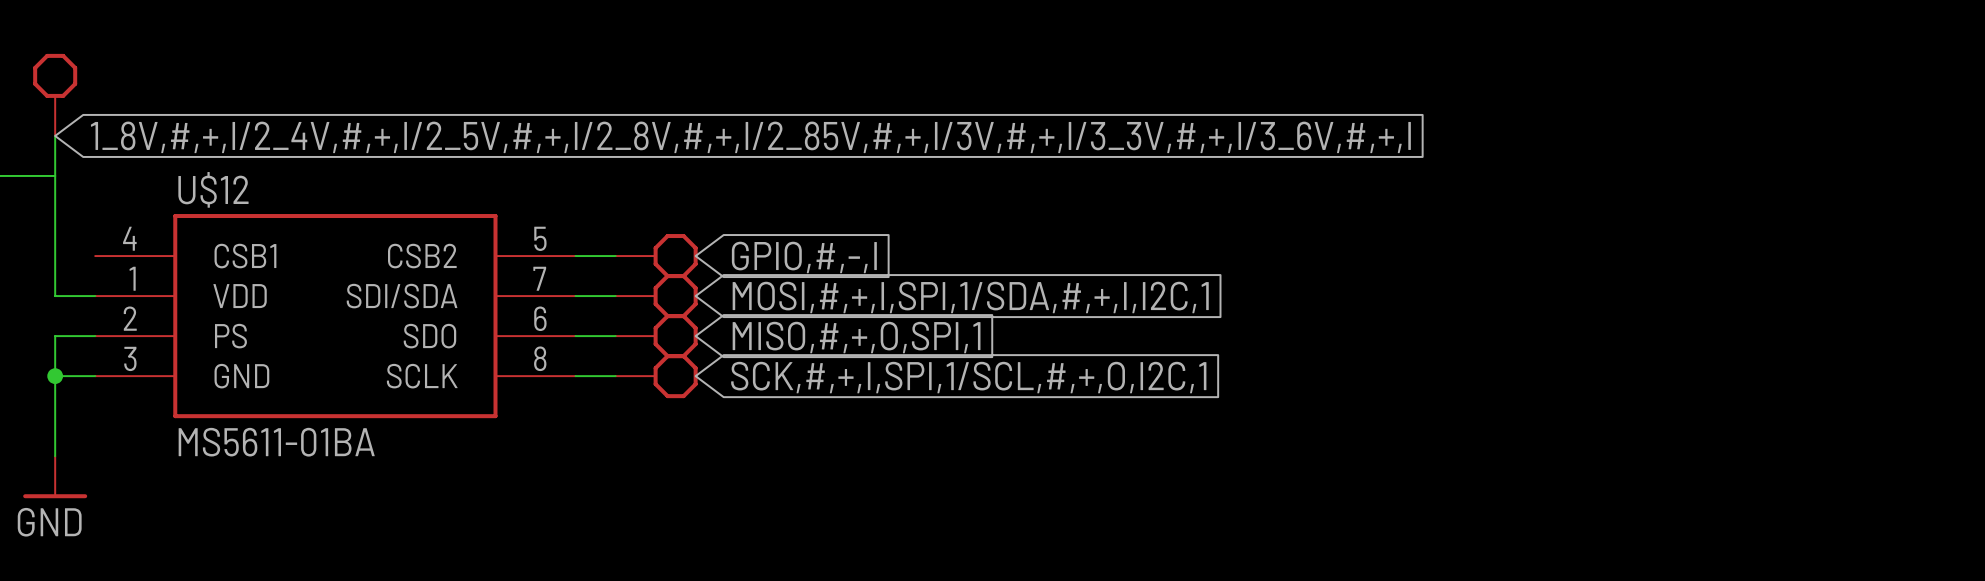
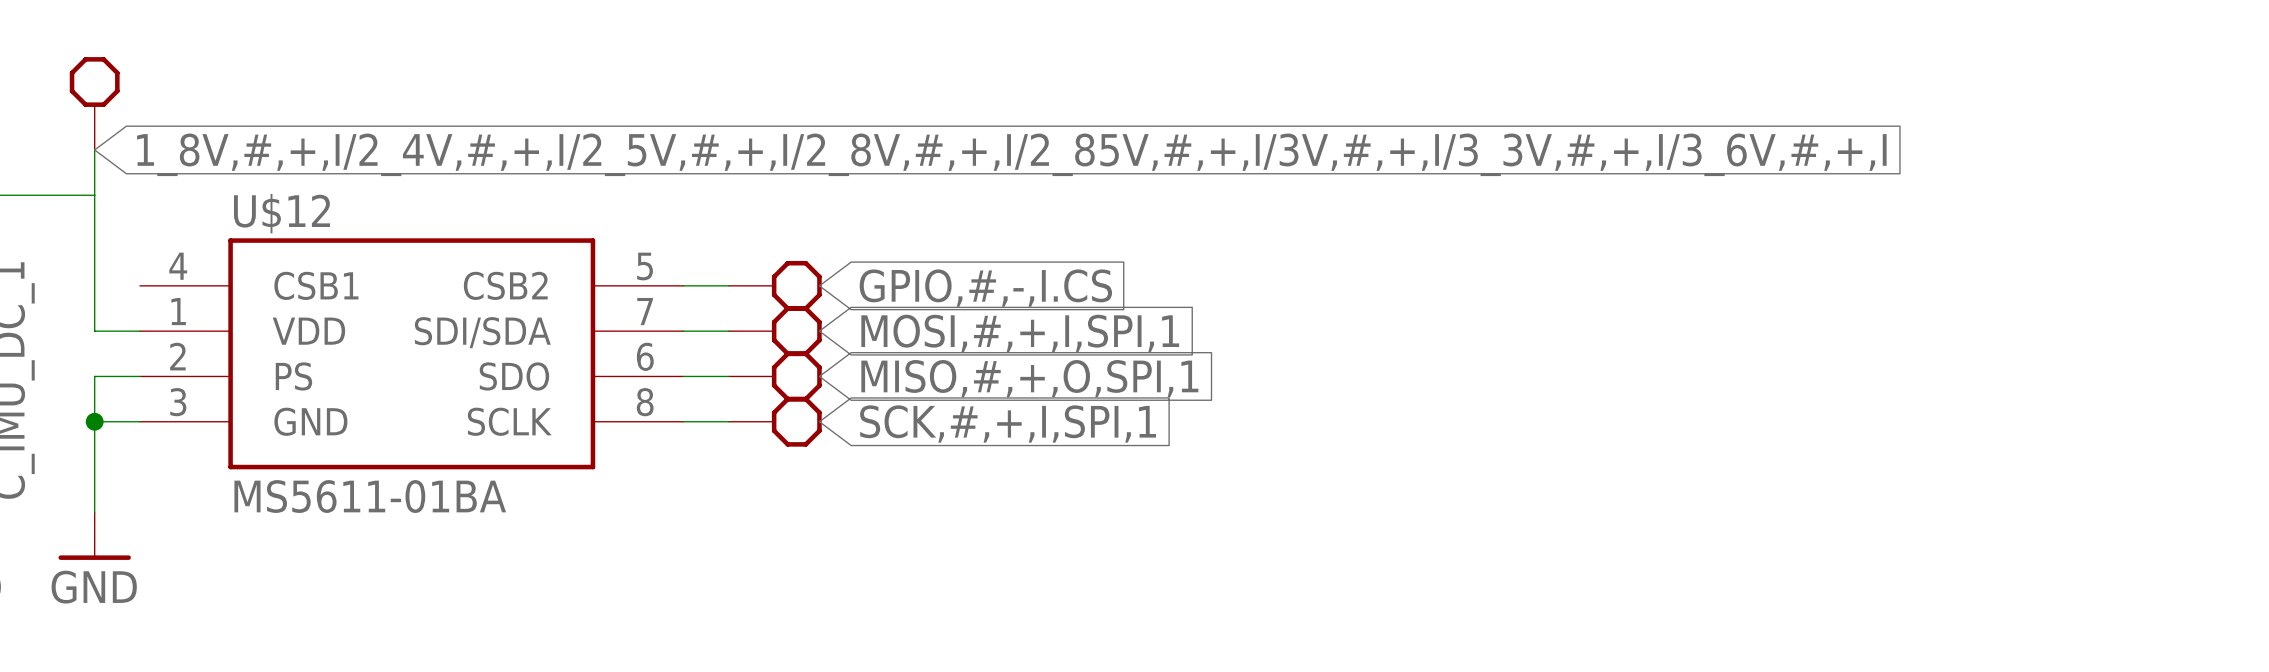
global label: GPIO,#,-,I (804, 257) -> GPIO,#,-,I.CS (985, 288)
global label: MOSI,#,+,I,SPI,1/SDA,#,+,I,I2C,1 (970, 297) -> MOSI,#,+,I,SPI,1 (1020, 333)
global label: SCK,#,+,I,SPI,1/SCL,#,+,O,I2C,1 (968, 377) -> SCK,#,+,I,SPI,1 (1008, 423)

